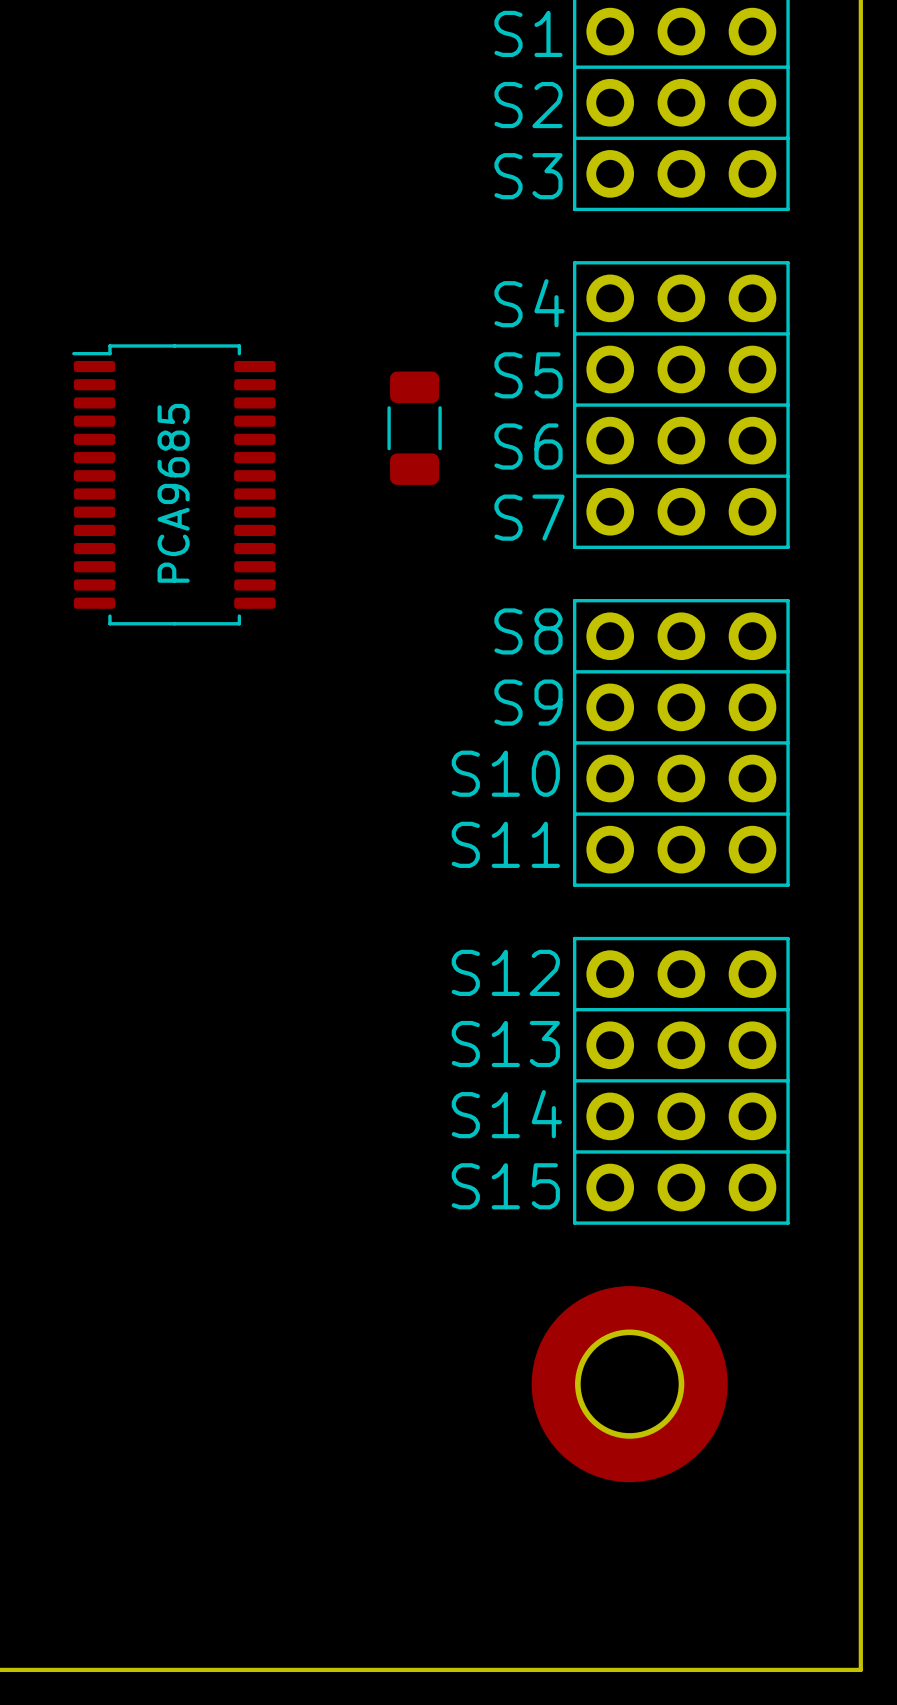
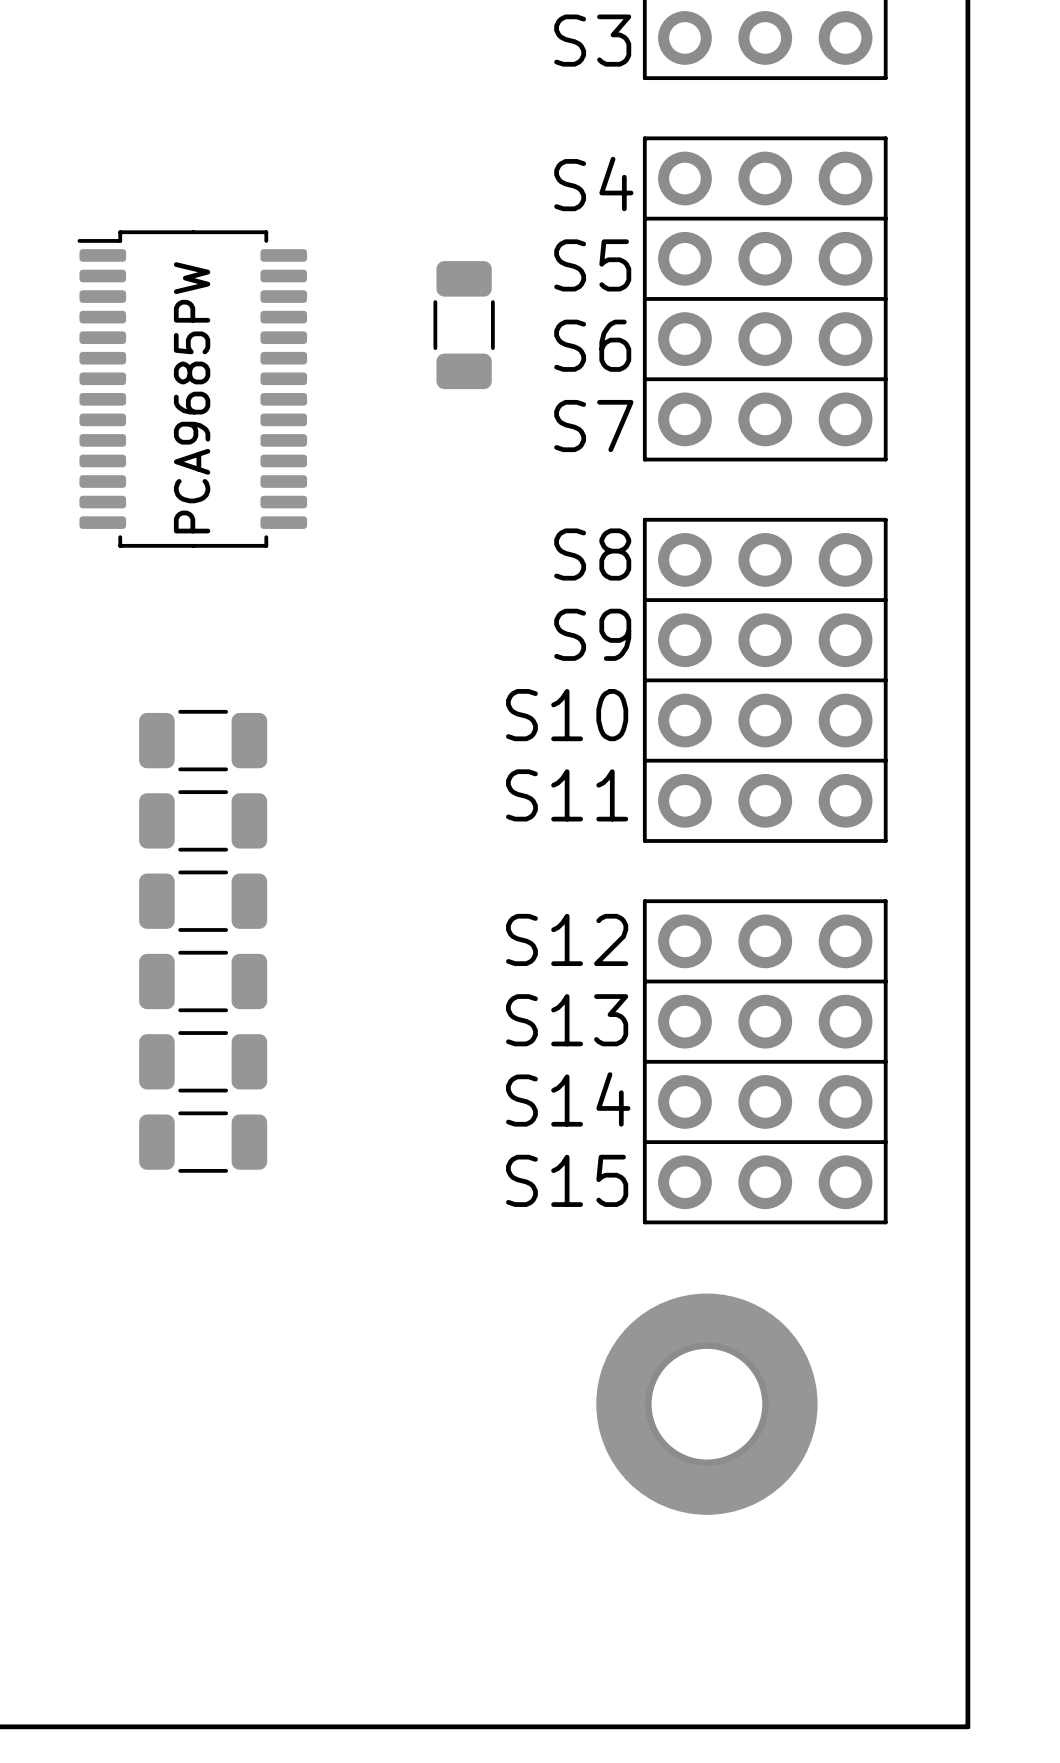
part value: PCA9685 (173, 493) -> PCA9685PW (192, 397)
part: none -> (203, 740)
part: none -> (203, 820)
part: none -> (203, 901)
part: none -> (203, 981)
part: none -> (203, 1061)
part: none -> (203, 1142)

